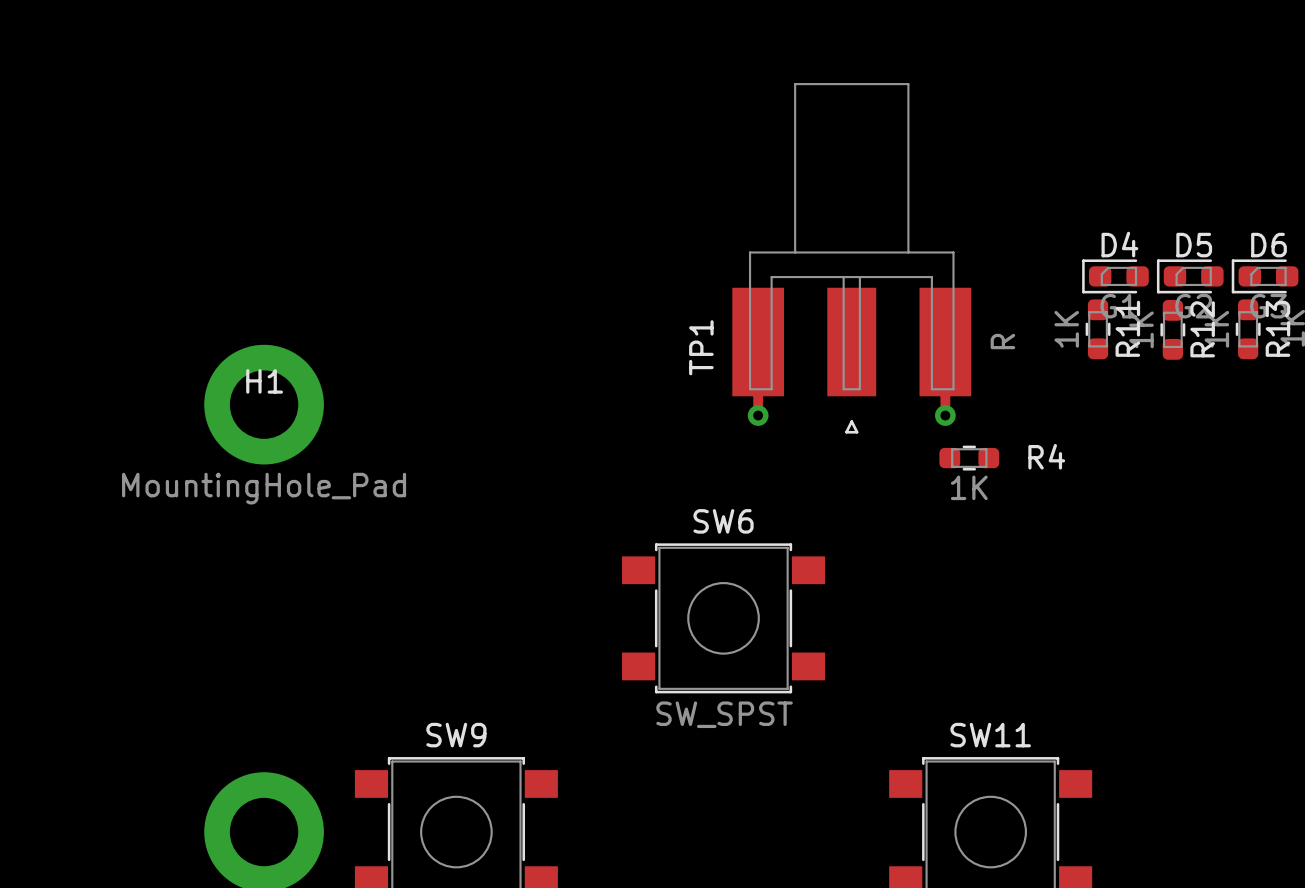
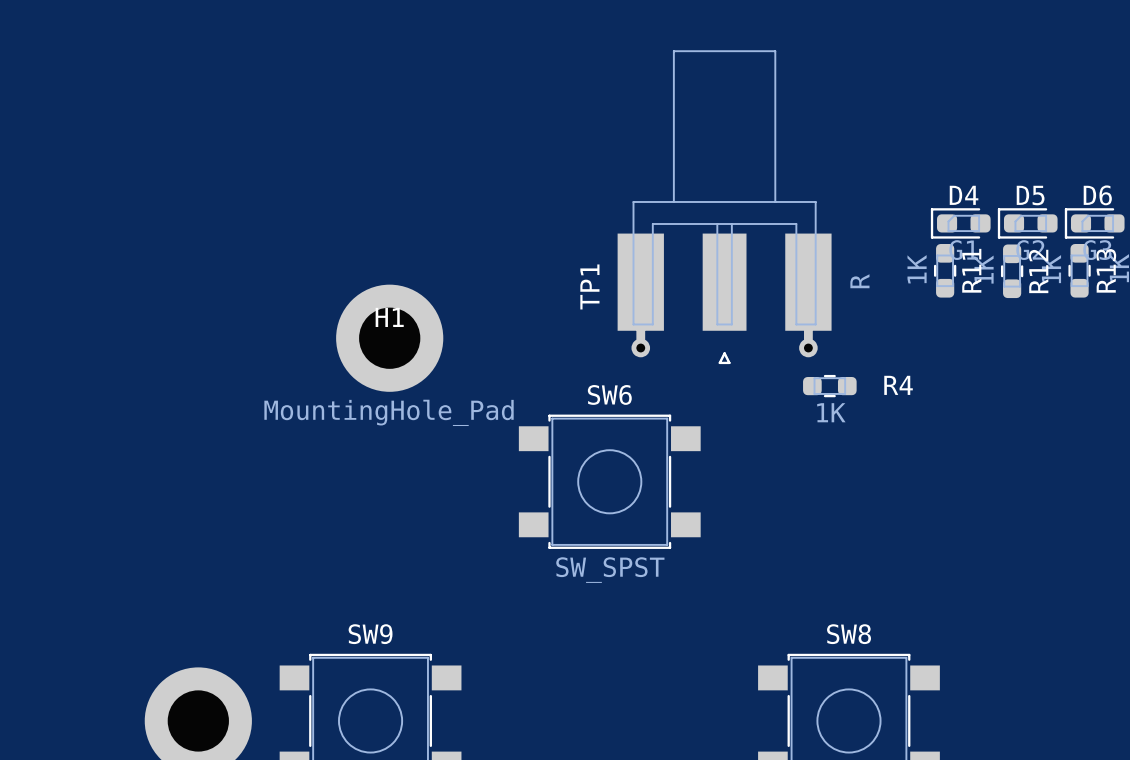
H1 position: (264, 404) -> (389, 338)
SW6 position: (723, 618) -> (609, 481)
SW11 name: SW11 (990, 735) -> SW8 (849, 634)

